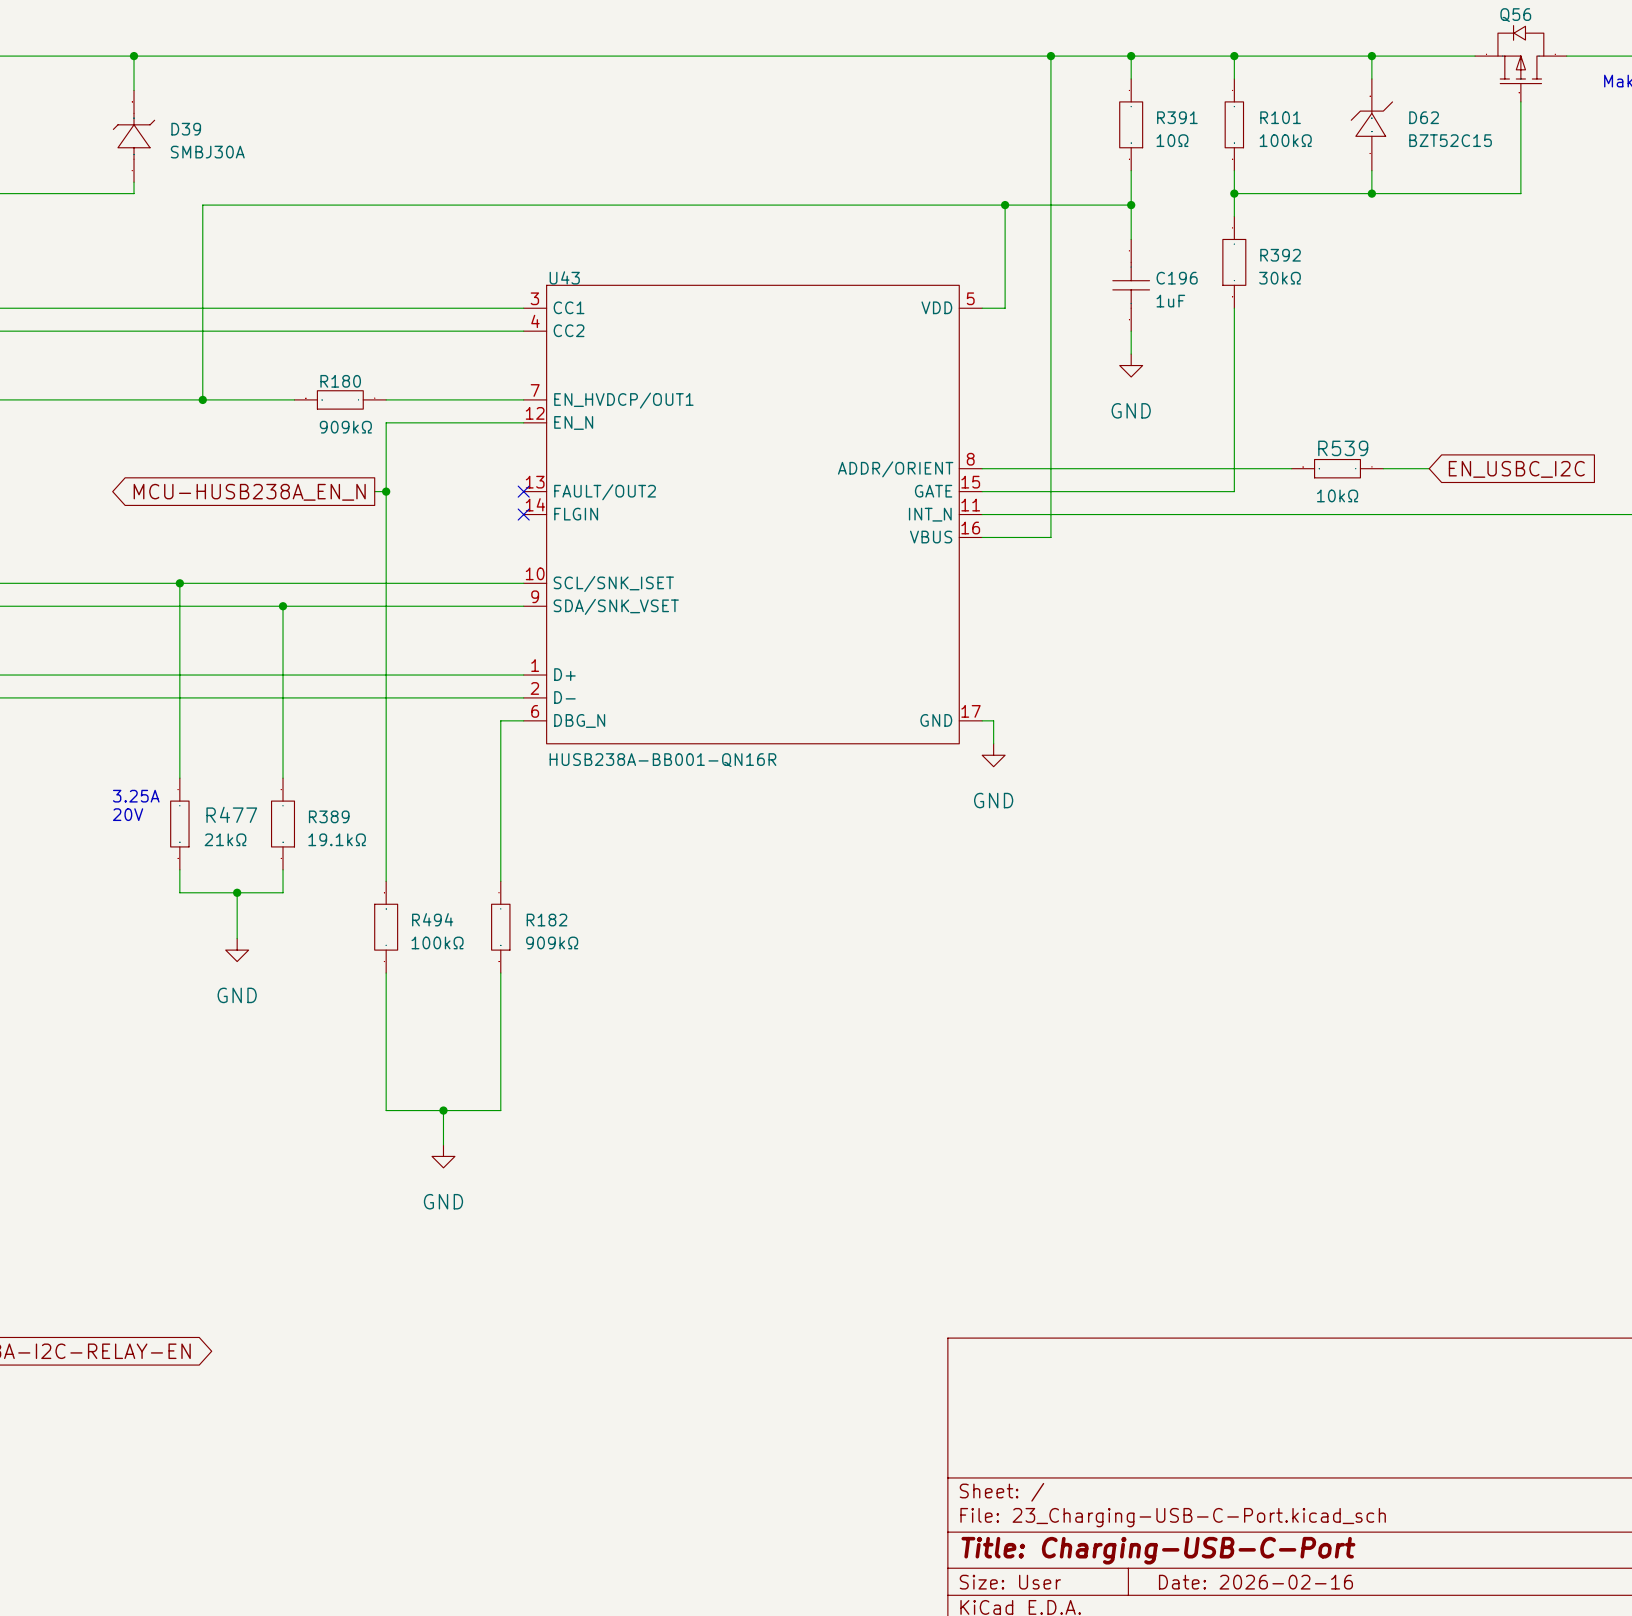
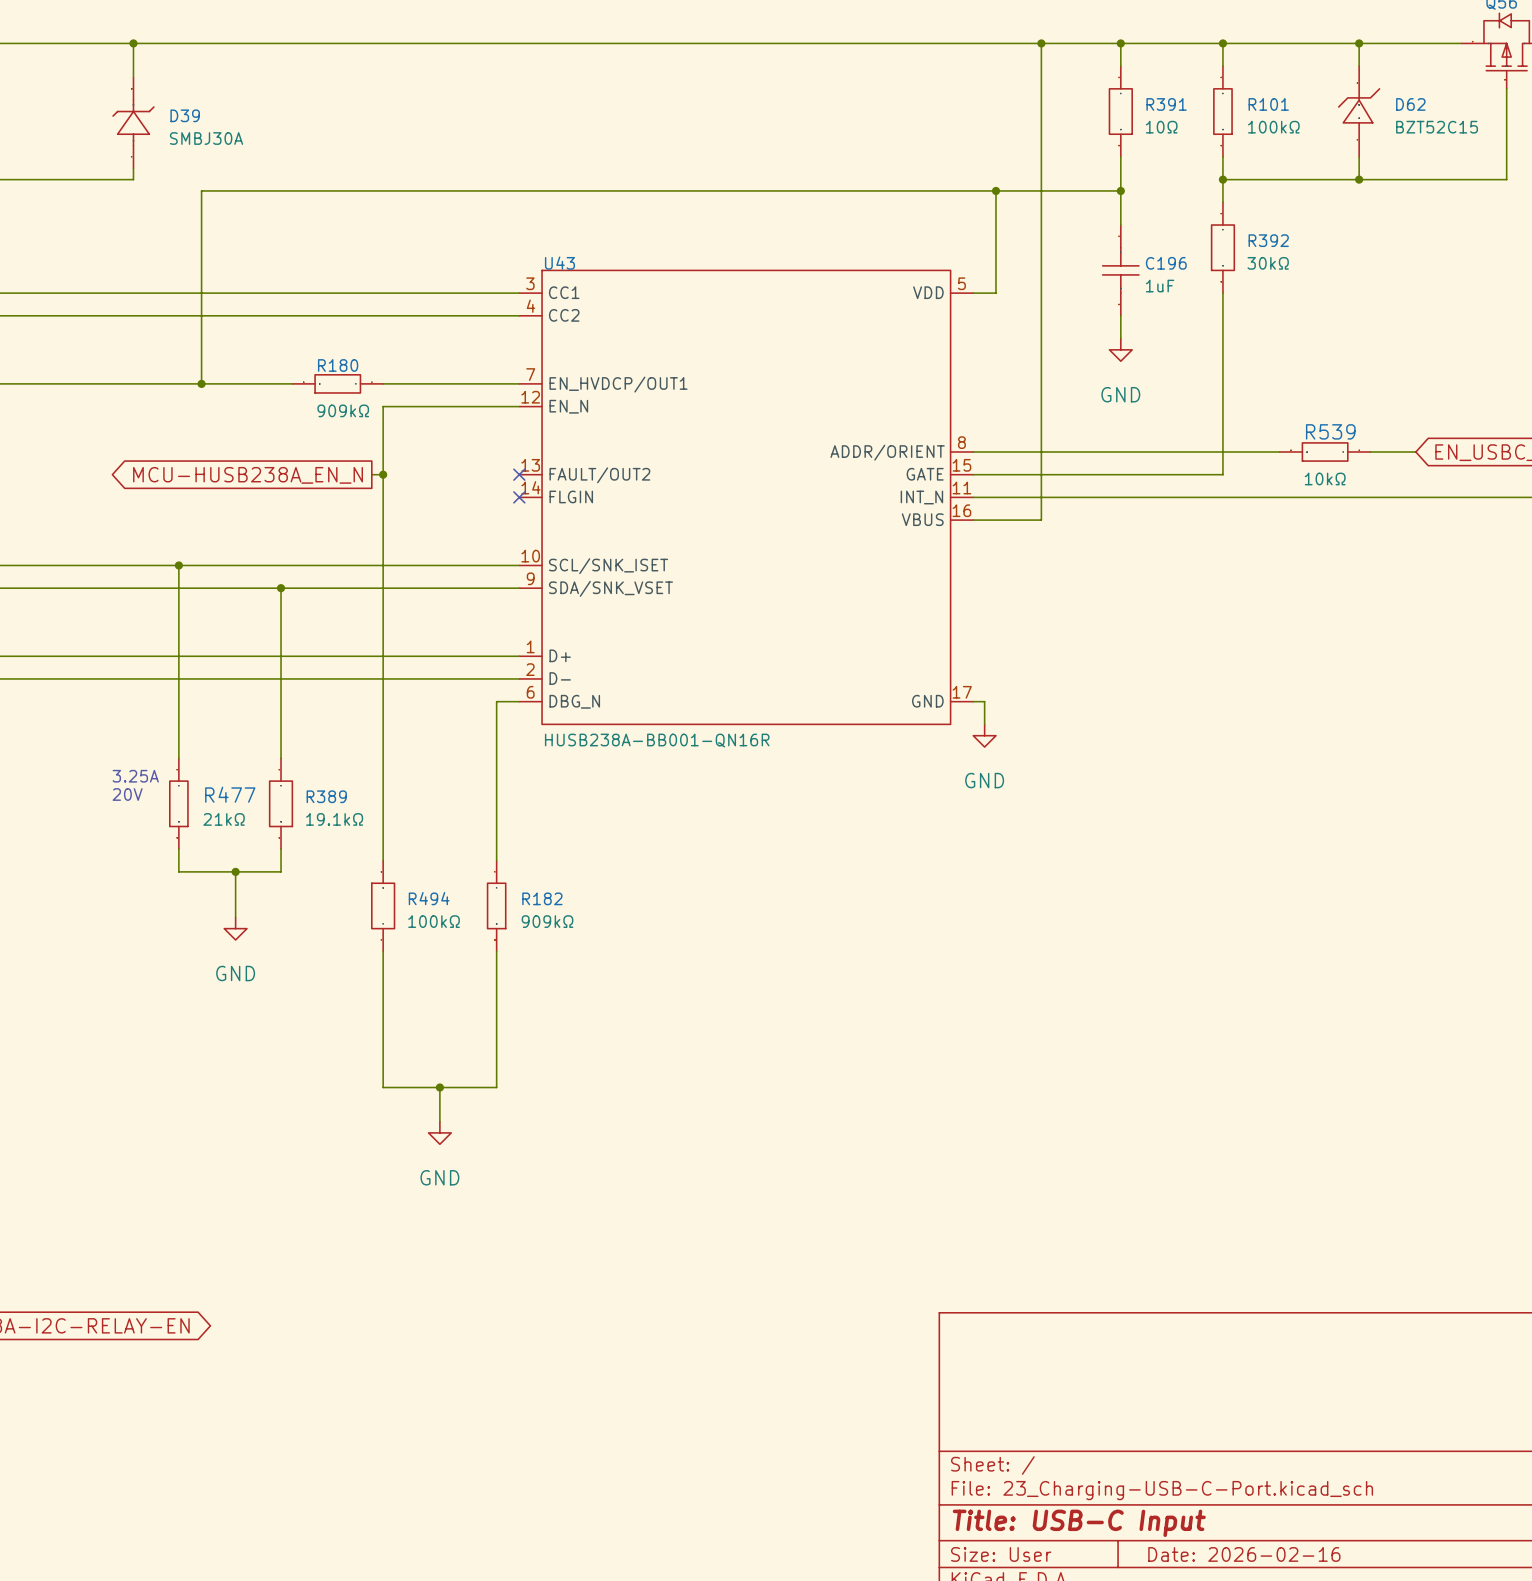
title block: Title: Charging-USB-C-Port (1158, 1550) -> Title: USB-C Input (1079, 1523)

